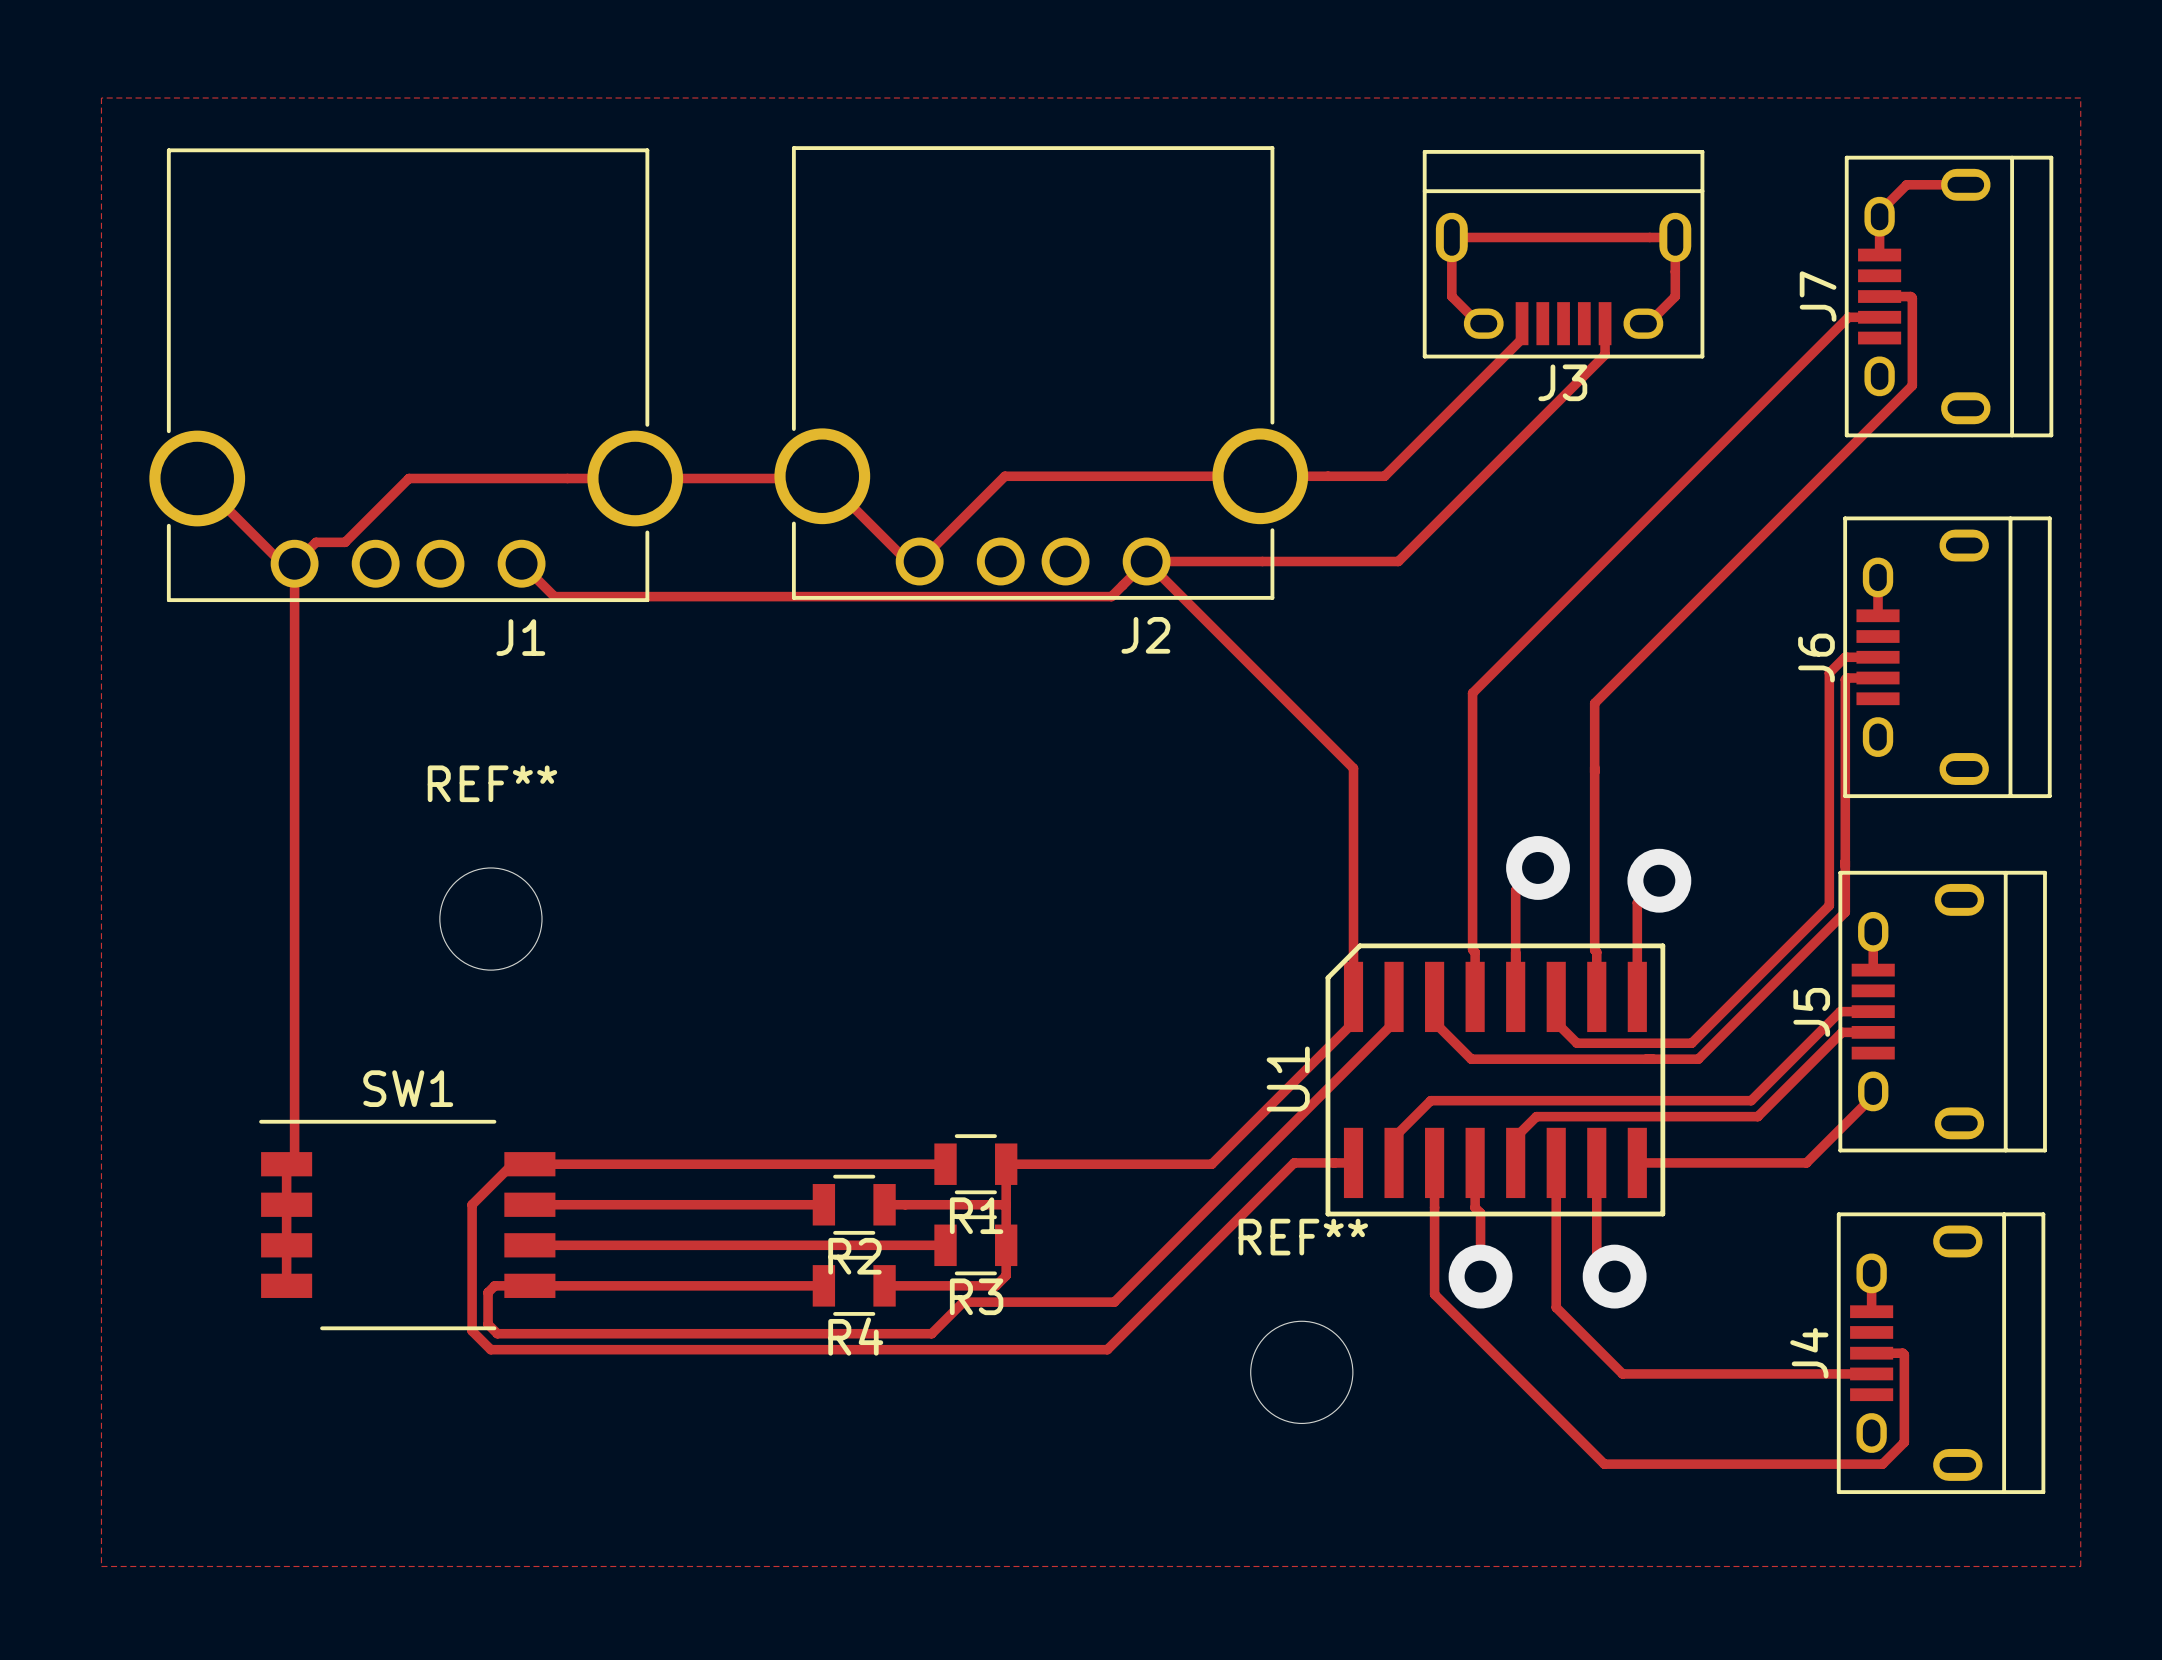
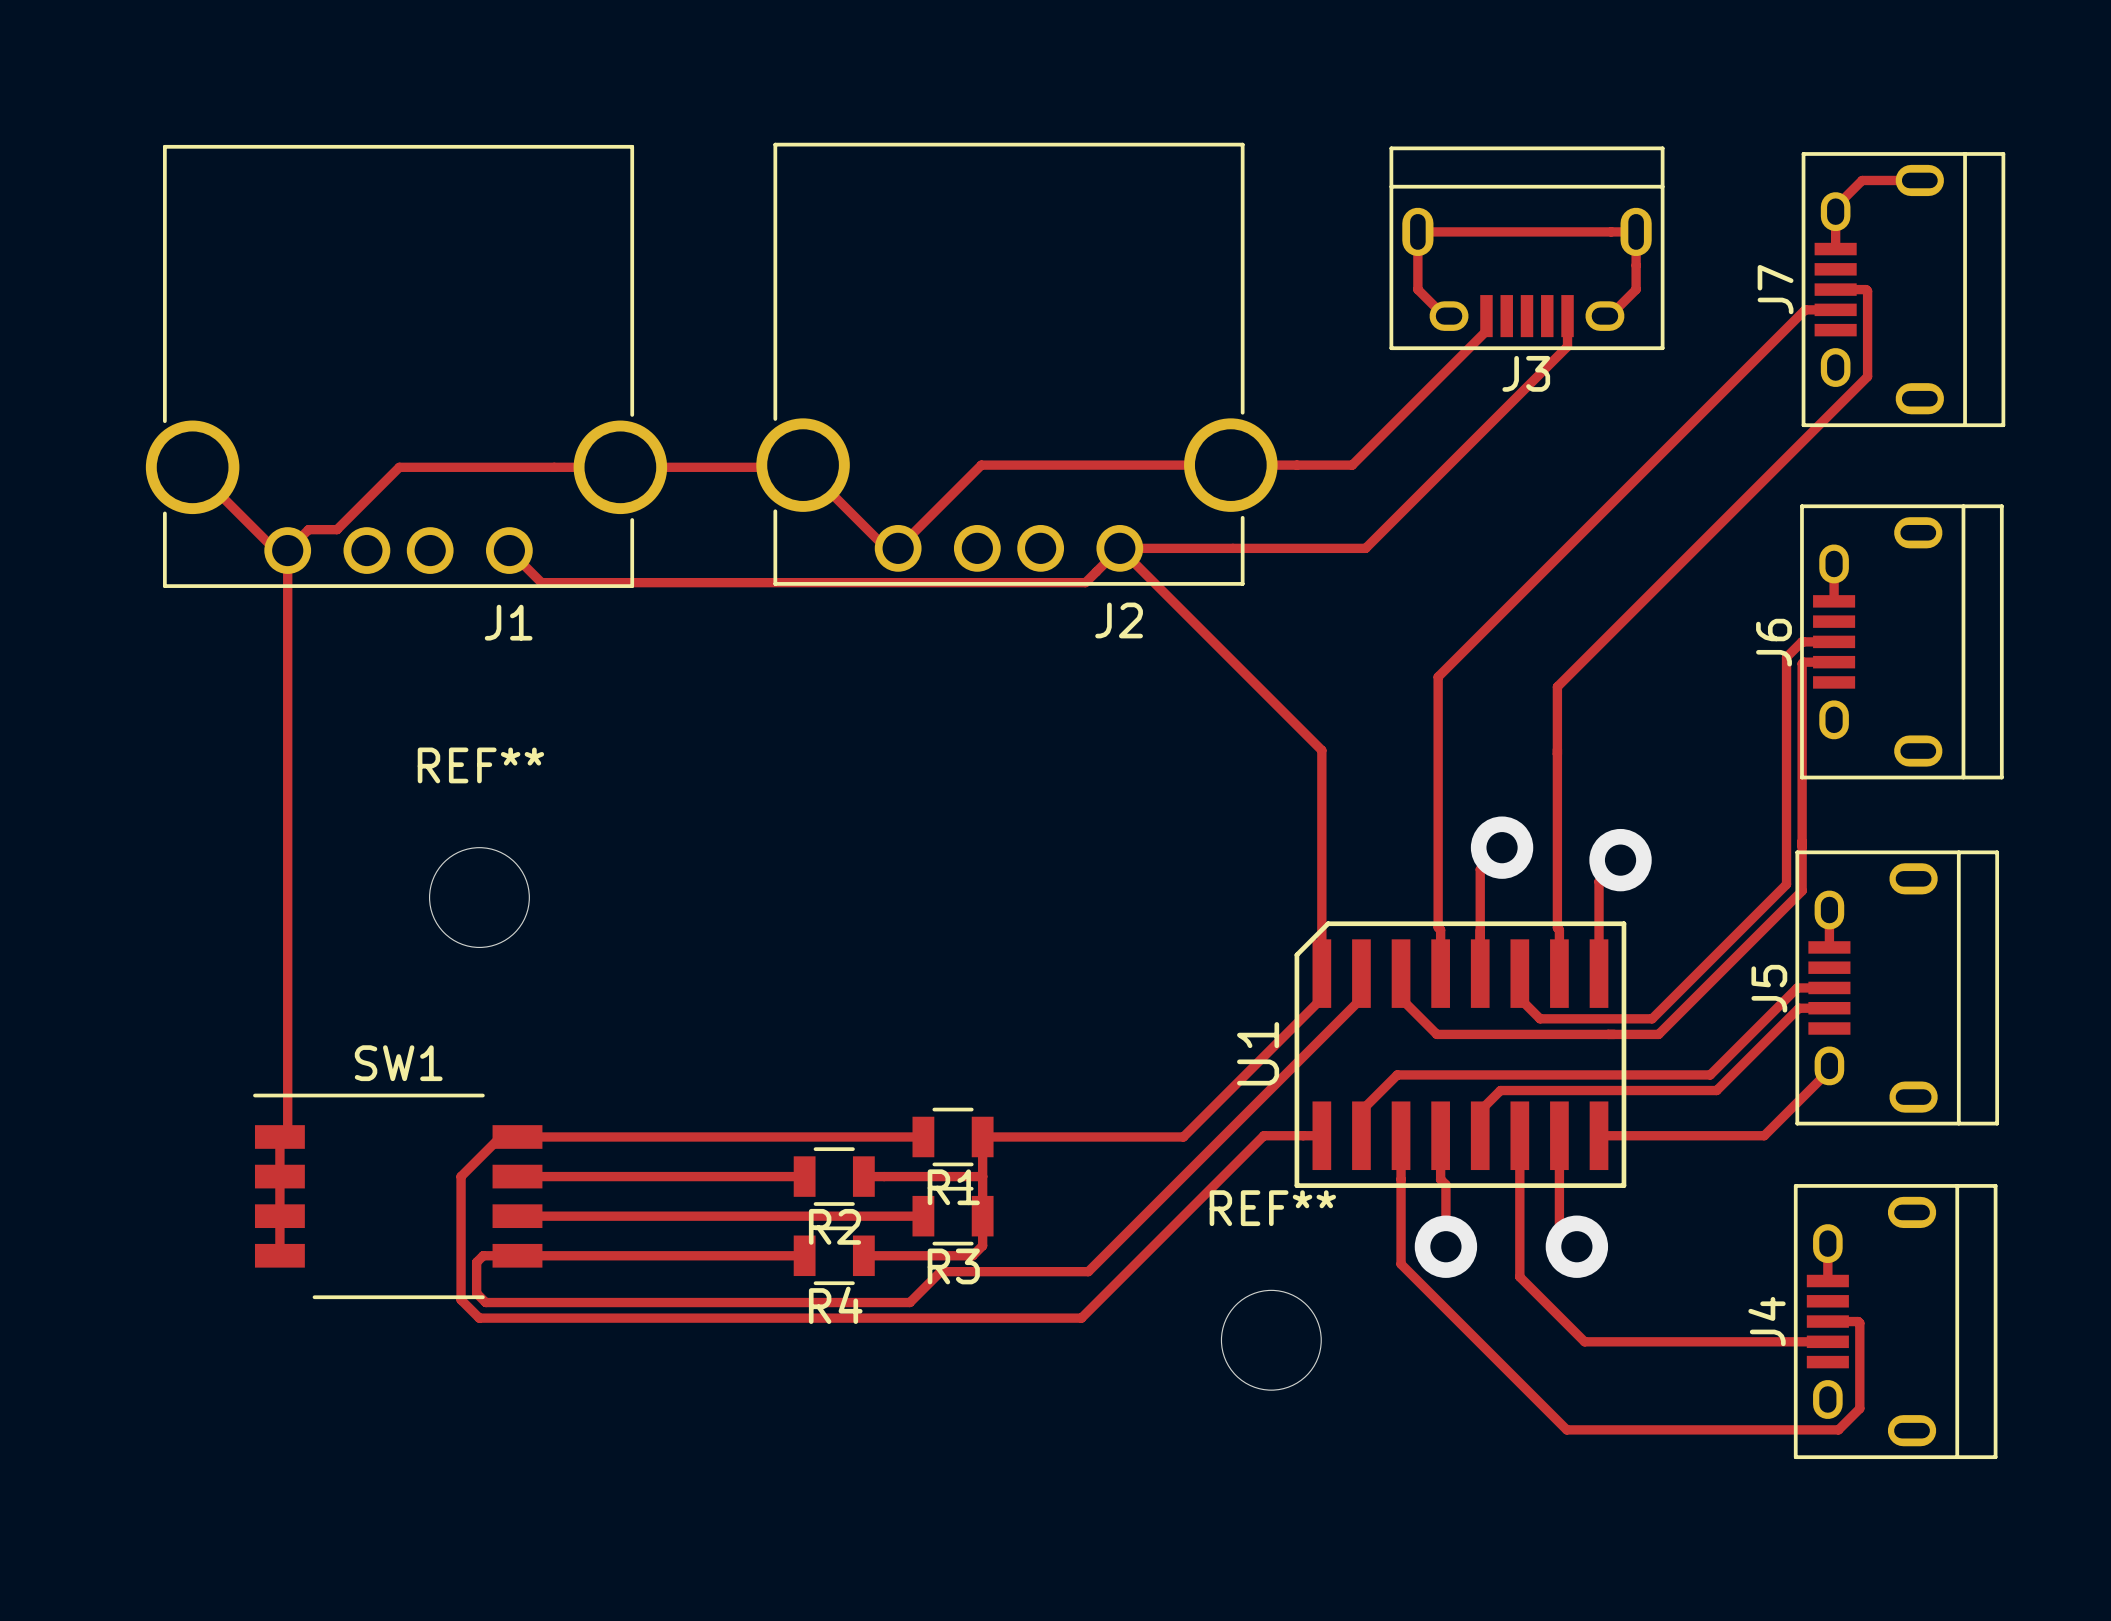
zone outline: (101, 98) (101, 1566) (2080, 1566) (2080, 98) (101, 98) -> none

